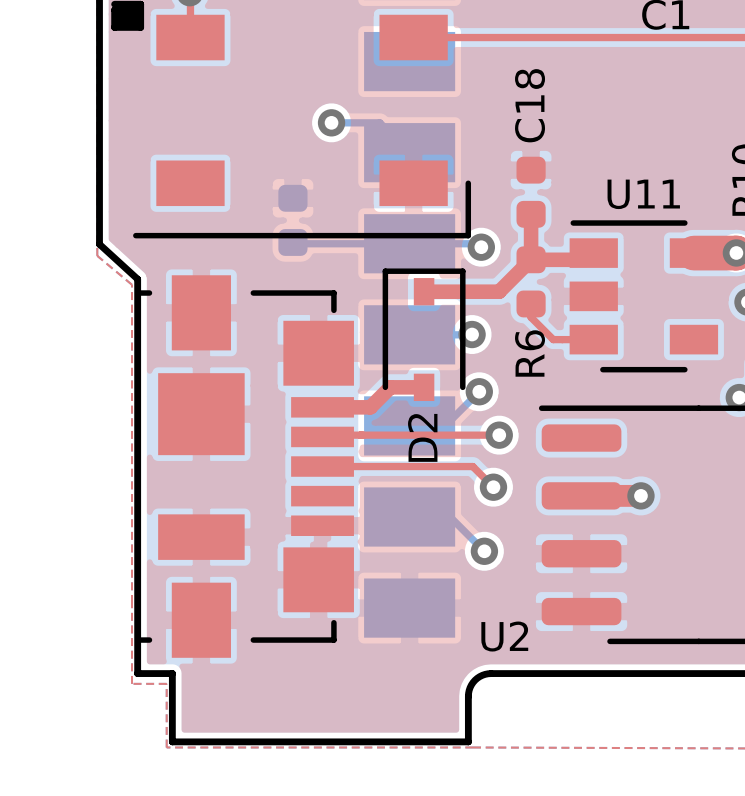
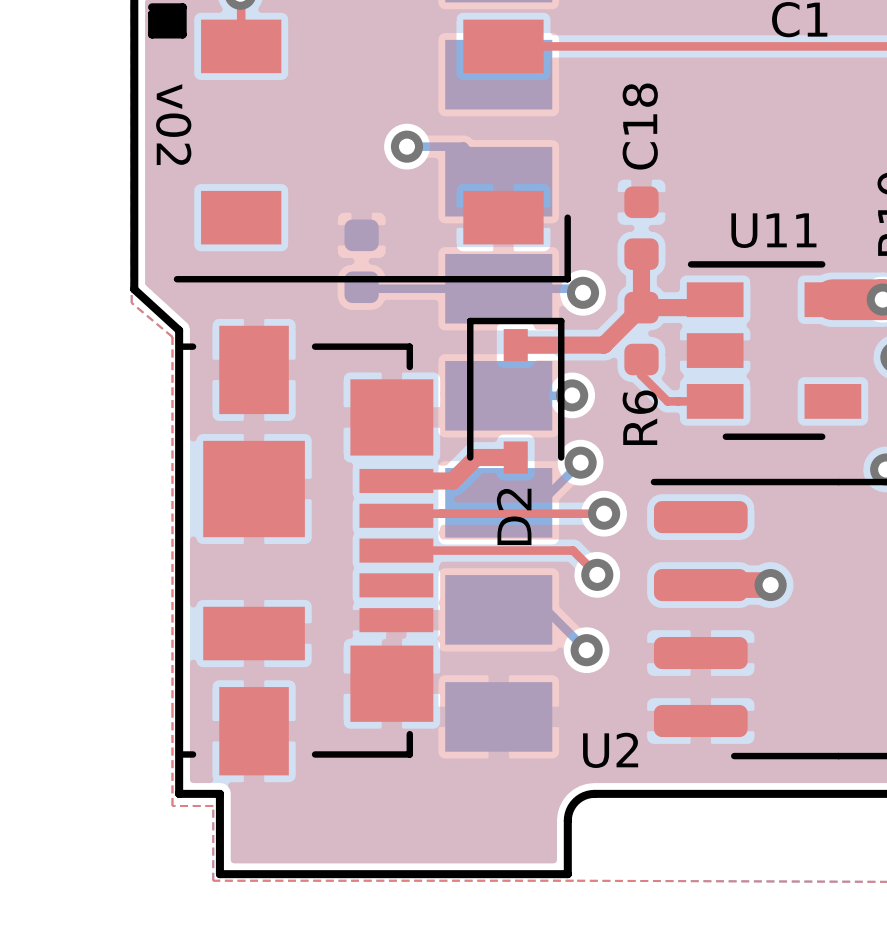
text: none -> v02 (173, 124)

